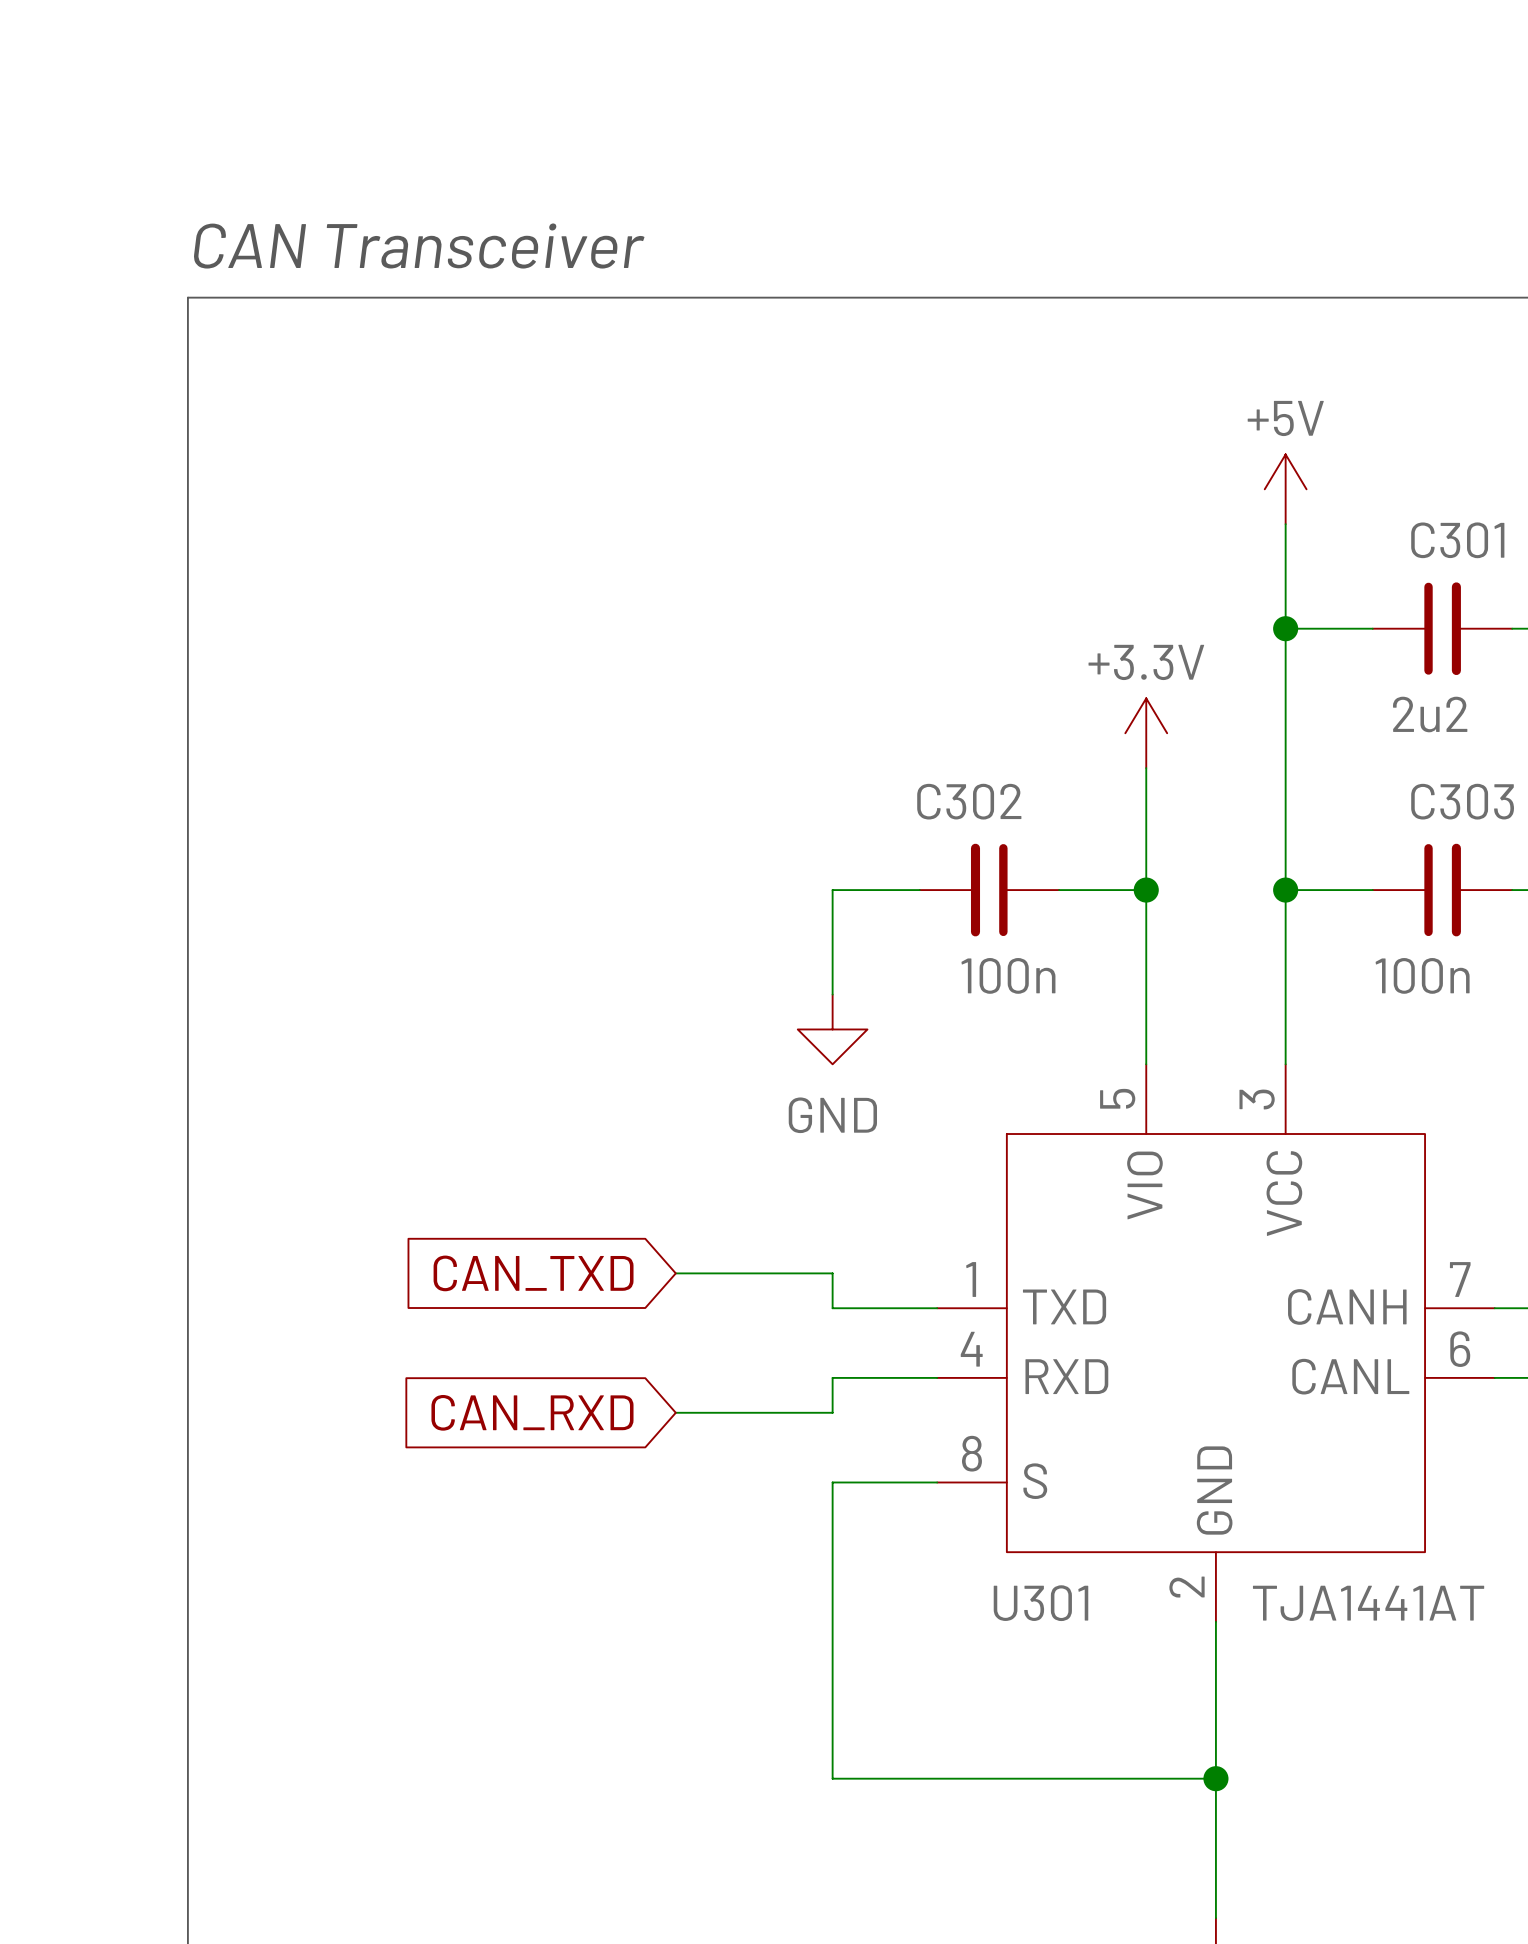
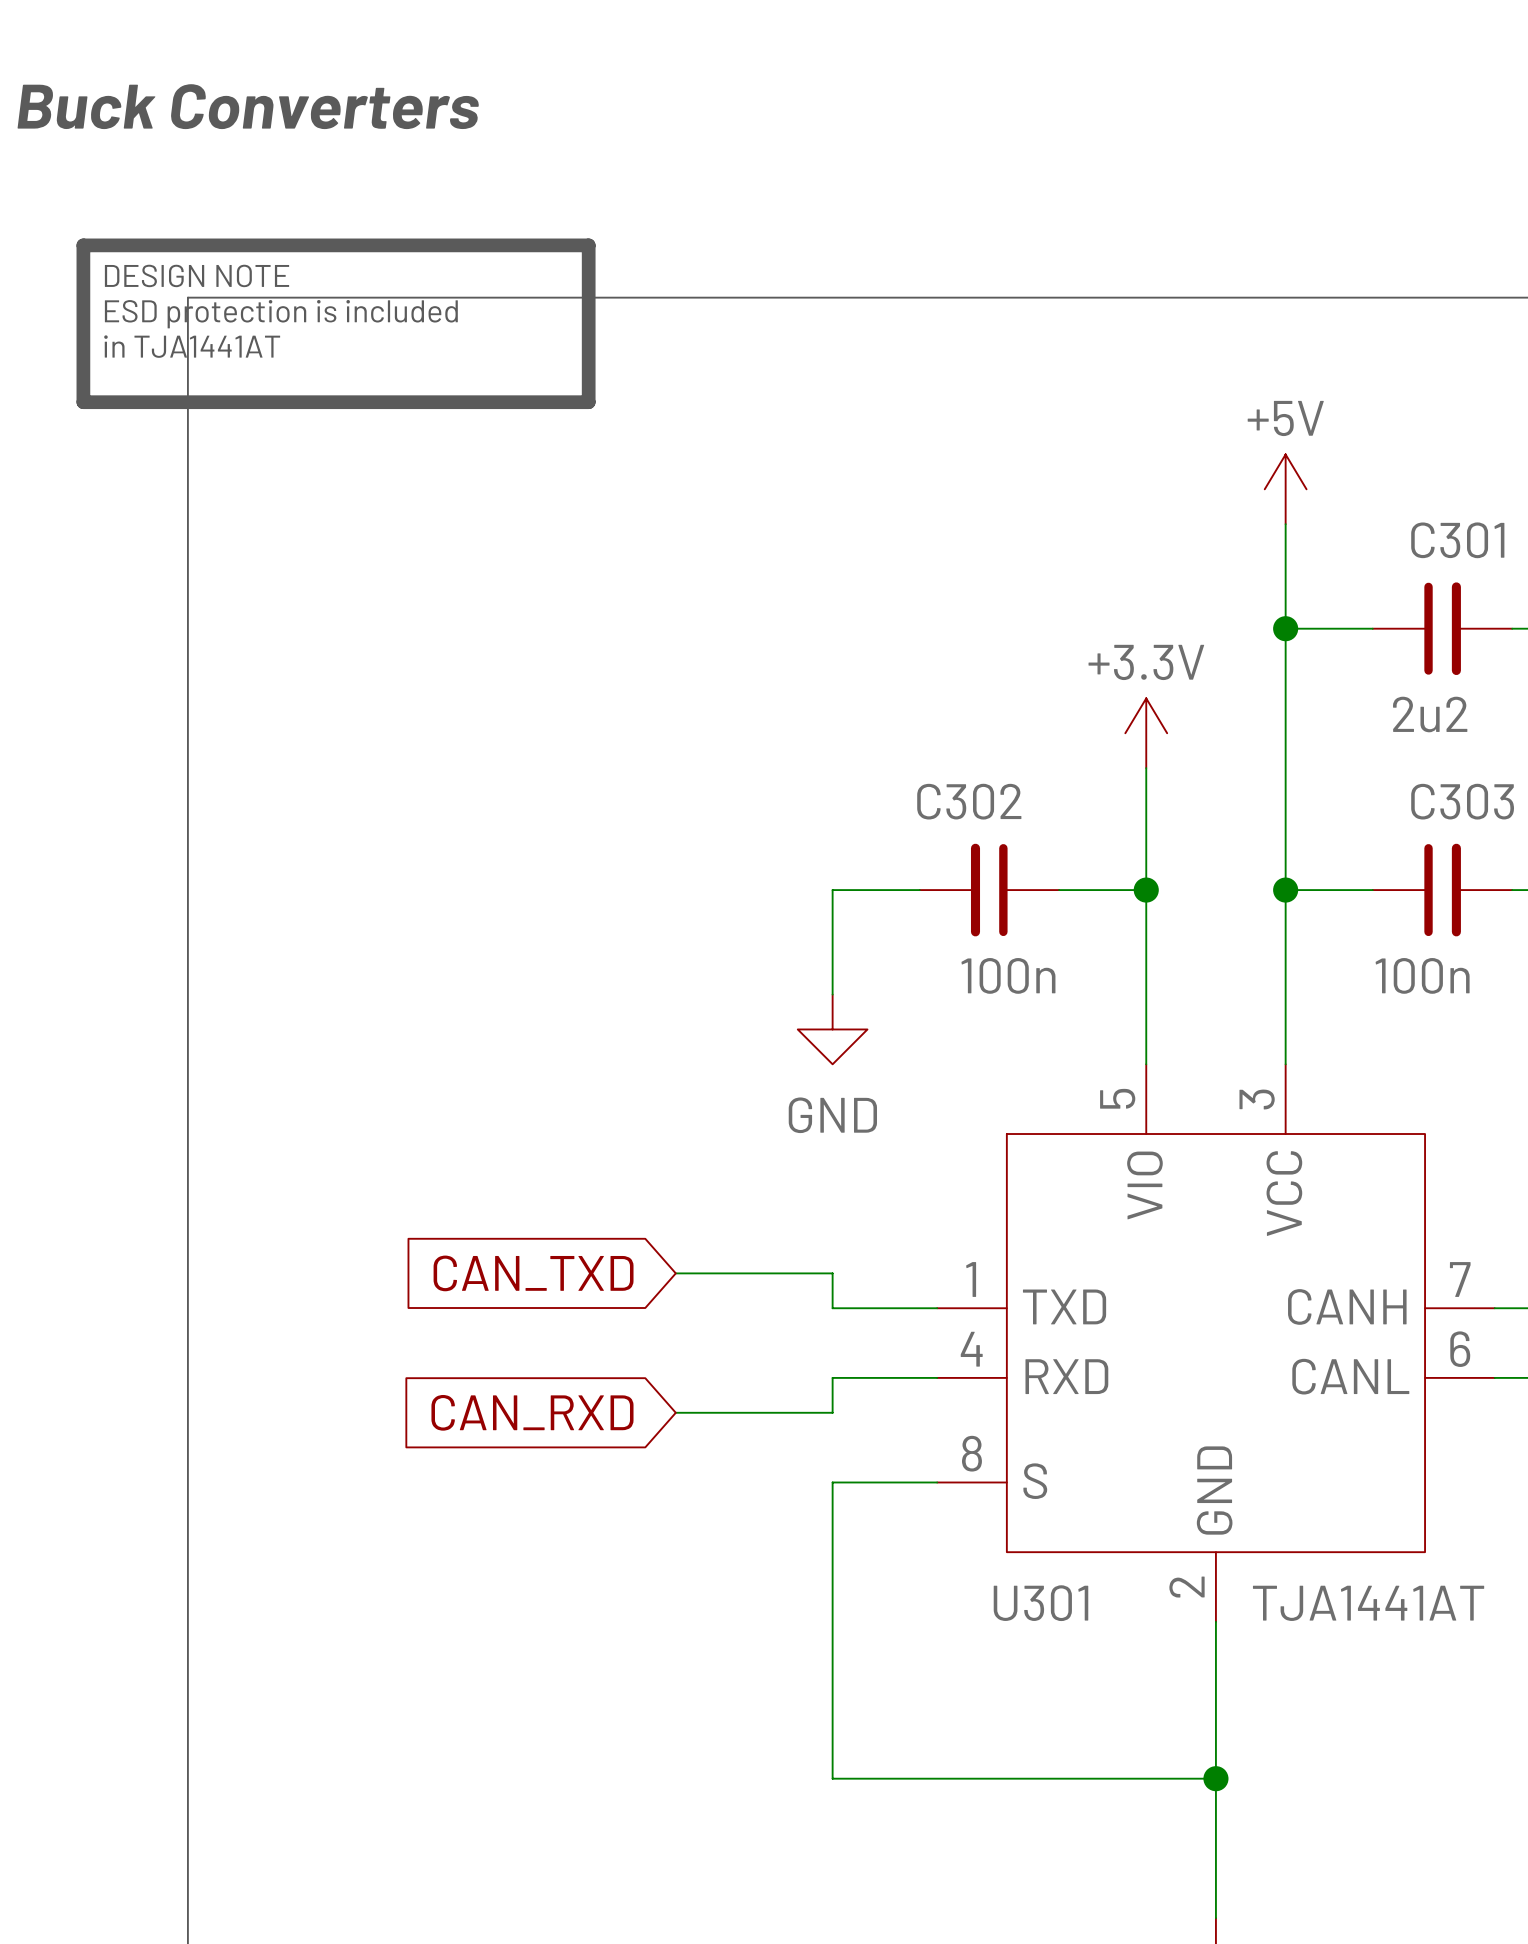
text: none -> Buck Converters (248, 106)
line: none -> (83, 245) (588, 245) (588, 402) (83, 402) (83, 245)
text: CAN Transceiver (419, 246) -> none
text: none -> DESIGN NOTE (197, 275)
text: none -> ESD protection is included (281, 314)
text: none -> in TJA1441AT (192, 346)

